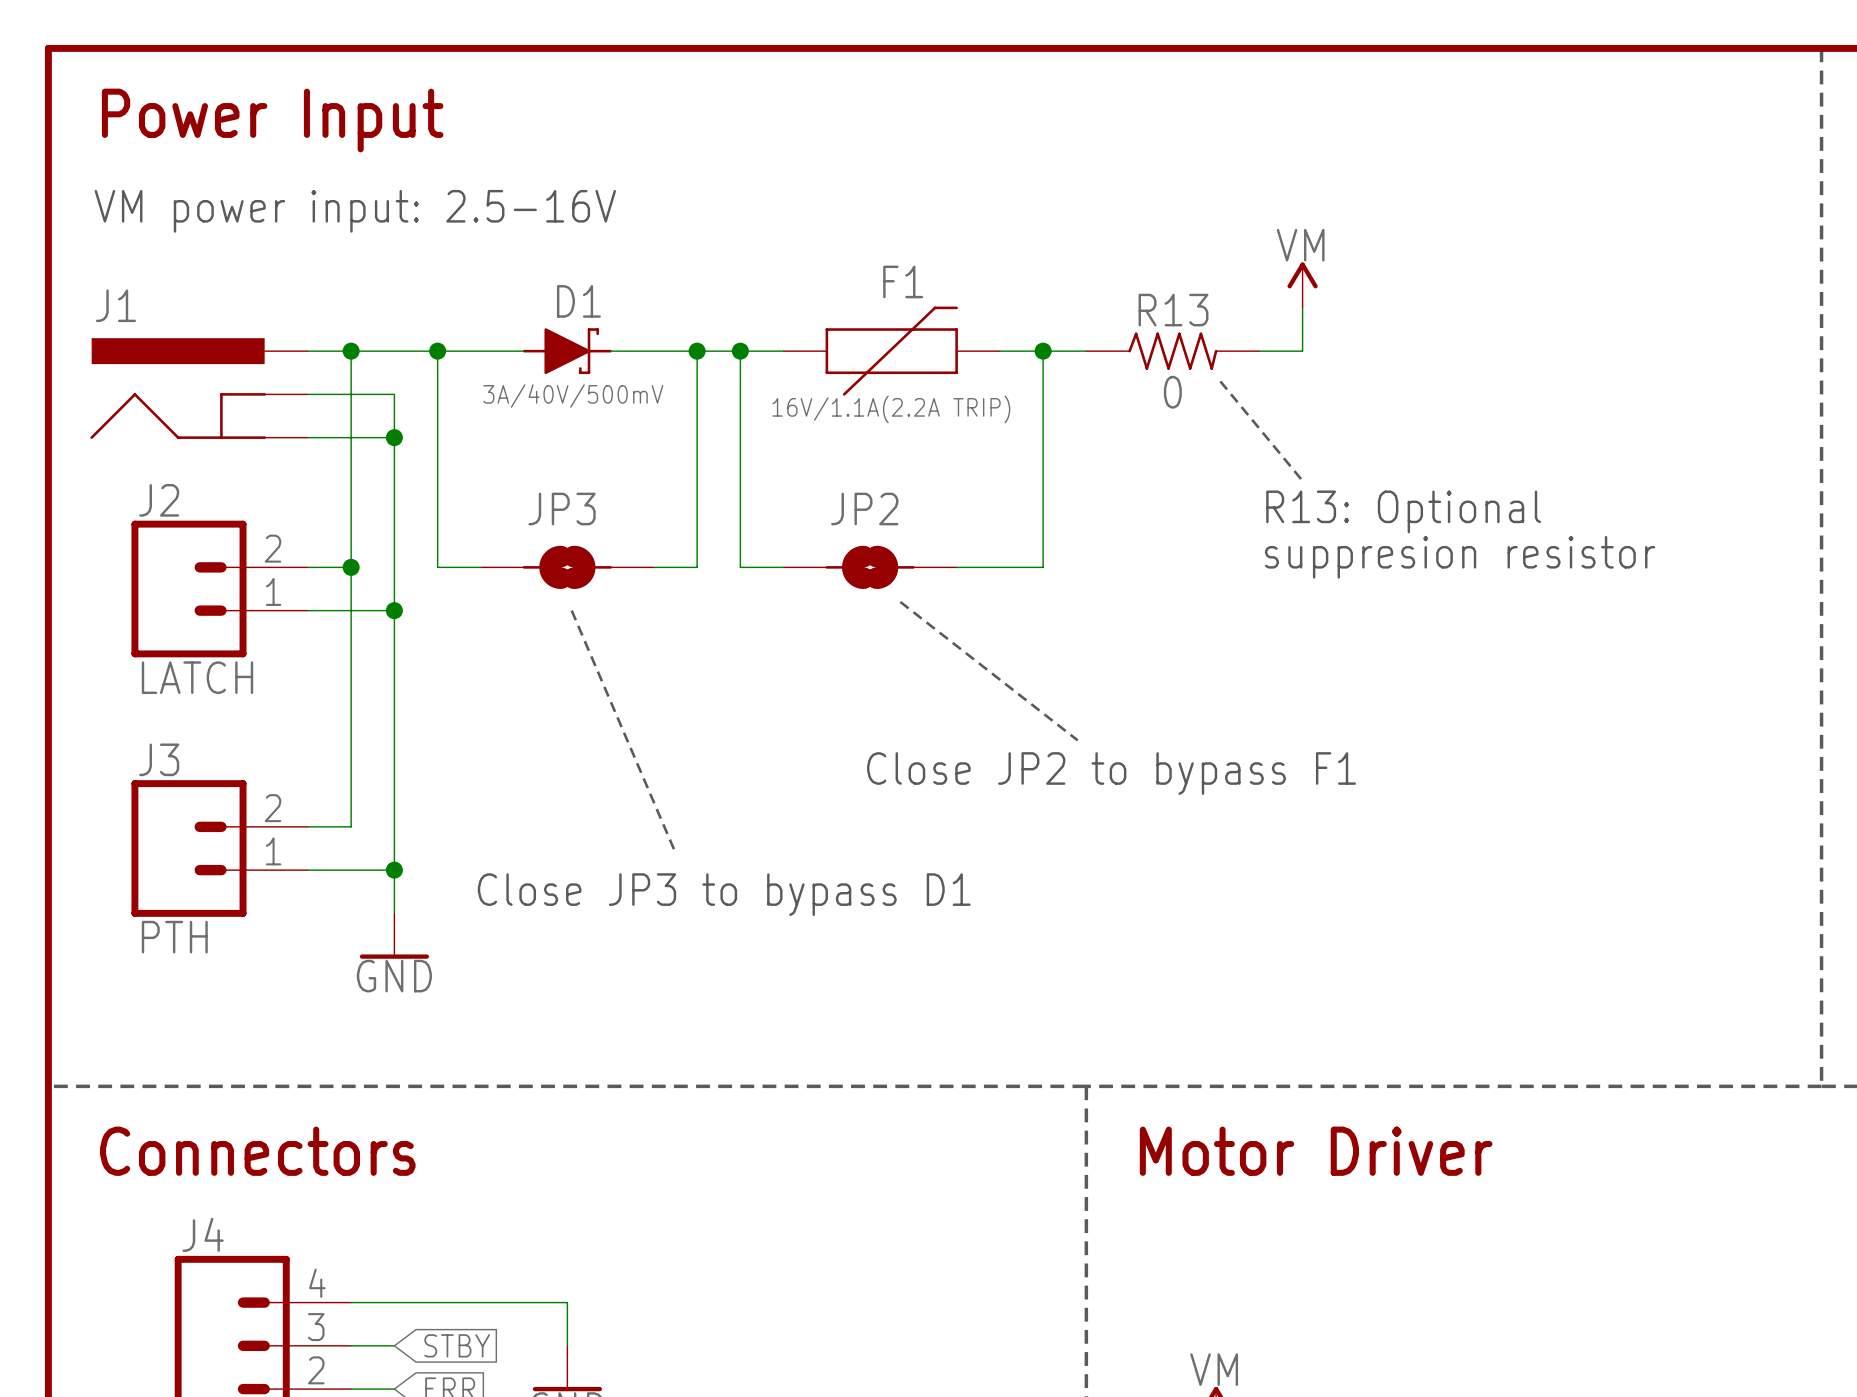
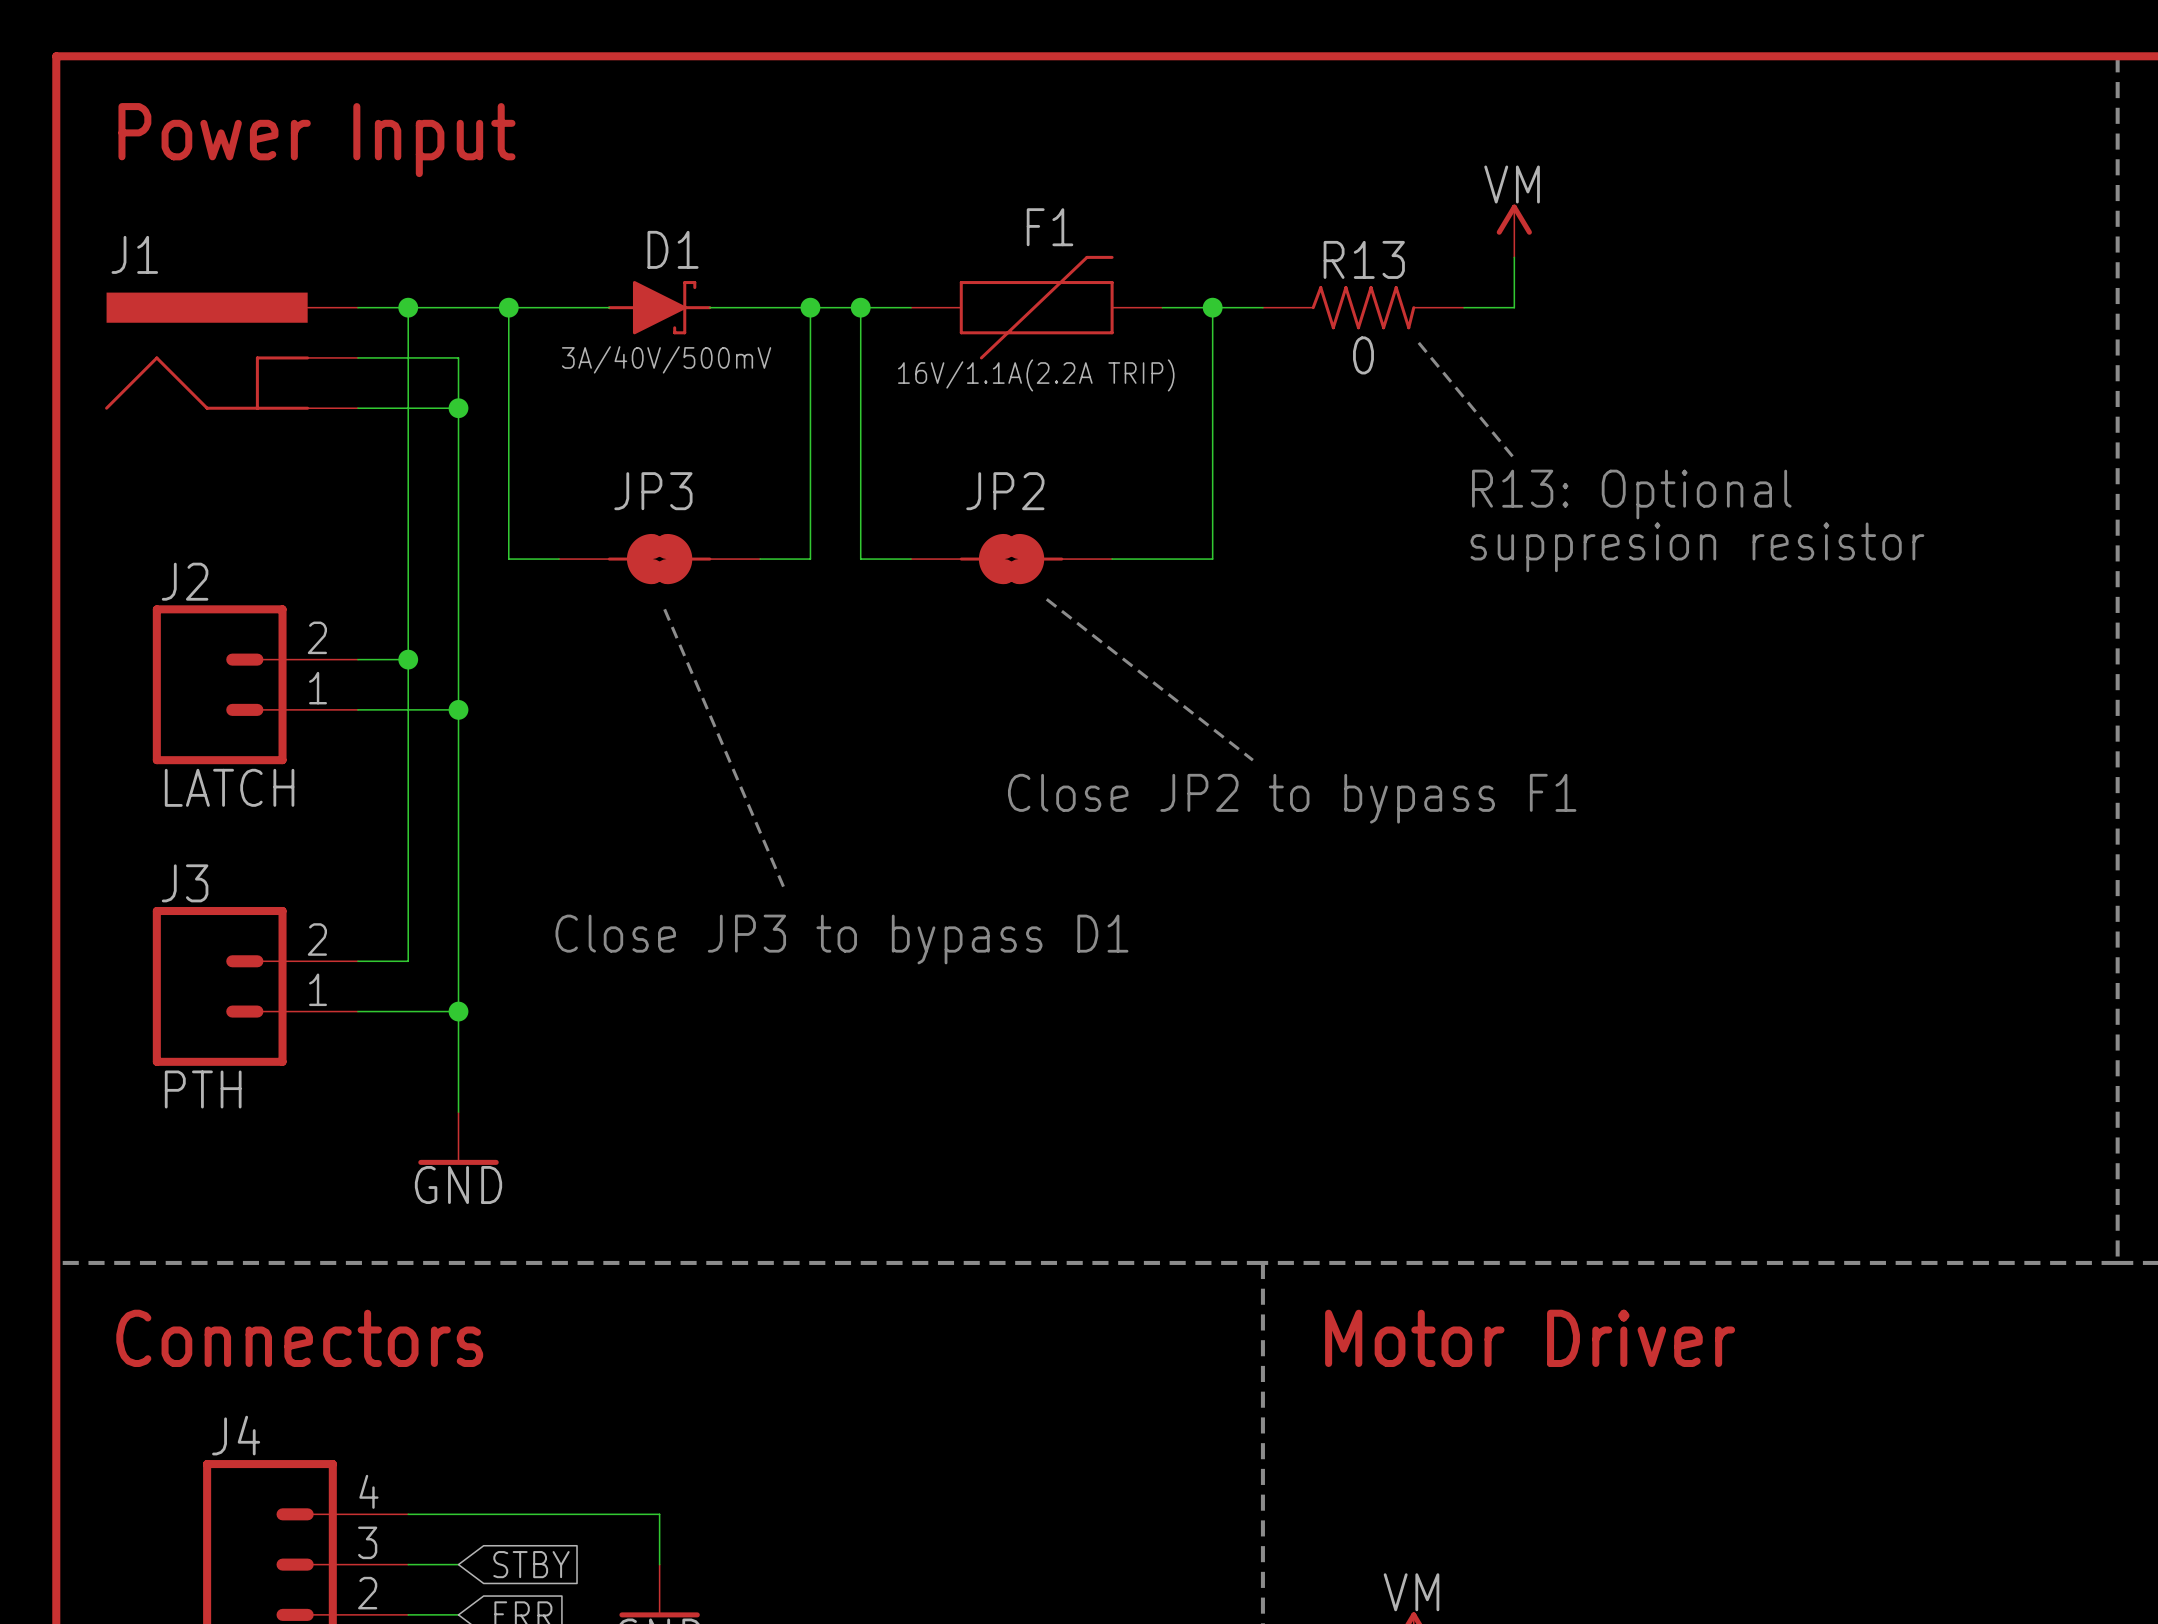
text: VM power input: 2.5-16V (355, 211) -> none
wire: none -> (357, 307) (609, 307)
wire: none -> (408, 307) (408, 408)
junction: none -> (408, 307)
wire: none -> (508, 307) (508, 408)
junction: none -> (508, 307)
wire: none -> (810, 307) (810, 408)
junction: none -> (810, 307)
wire: none -> (860, 307) (860, 408)
junction: none -> (860, 307)
wire: none -> (1212, 307) (1212, 408)
power symbol position: VM (1302, 285) -> VM (1514, 231)
wire: (1302, 307) (1302, 351) (1259, 351) -> (1514, 257) (1514, 307) (1464, 307)
junction: (351, 351) -> none
wire: (394, 351) (524, 351) -> none
junction: none -> (458, 408)
junction: (437, 351) -> none
D1 position: (567, 351) -> (659, 307)
wire: (610, 351) (783, 351) -> (709, 307) (911, 307)
junction: (697, 351) -> none
junction: (740, 351) -> none
F1 position: (891, 351) -> (1036, 307)
wire: (999, 351) (1086, 351) -> (1162, 307) (1262, 307)
junction position: (1043, 351) -> (1212, 307)
R13 position: (1172, 351) -> (1363, 307)
line: (1220, 381) (1302, 480) -> (1418, 342) (1514, 458)
J1 position: (199, 388) -> (231, 351)
wire: (307, 394) (394, 394) -> (357, 357) (458, 357) (458, 458)
wire: (307, 437) (394, 437) -> none
junction: (394, 437) -> none
wire: (437, 480) (437, 567) (480, 567) -> (508, 559) (559, 559)
wire: (697, 480) (697, 567) (653, 567) -> (810, 559) (760, 559)
wire: (740, 480) (740, 567) (783, 567) -> (860, 559) (911, 559)
wire: (1043, 480) (1043, 567) (956, 567) -> (1212, 559) (1112, 559)
text position: R13: Optional (1403, 511) -> R13: Optional (1631, 494)
text position: suppresion resistor (1460, 557) -> suppresion resistor (1697, 547)
JP3 position: (567, 567) -> (659, 559)
JP2 position: (870, 567) -> (1011, 559)
line: (900, 601) (1077, 740) -> (1046, 599) (1252, 760)
line: (571, 610) (675, 852) -> (664, 609) (785, 890)
text position: Close JP2 to bypass F1 (1111, 773) -> Close JP2 to bypass F1 (1292, 798)
text position: Close JP3 to bypass D1 (724, 894) -> Close JP3 to bypass D1 (841, 939)
power symbol position: GND (394, 936) -> GND (458, 1138)

